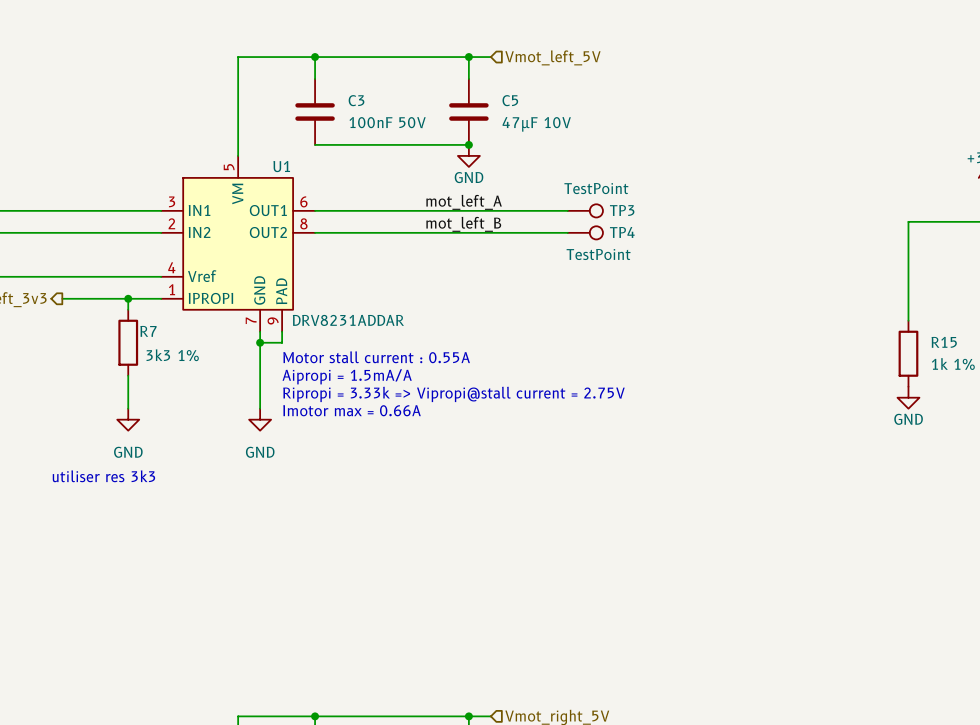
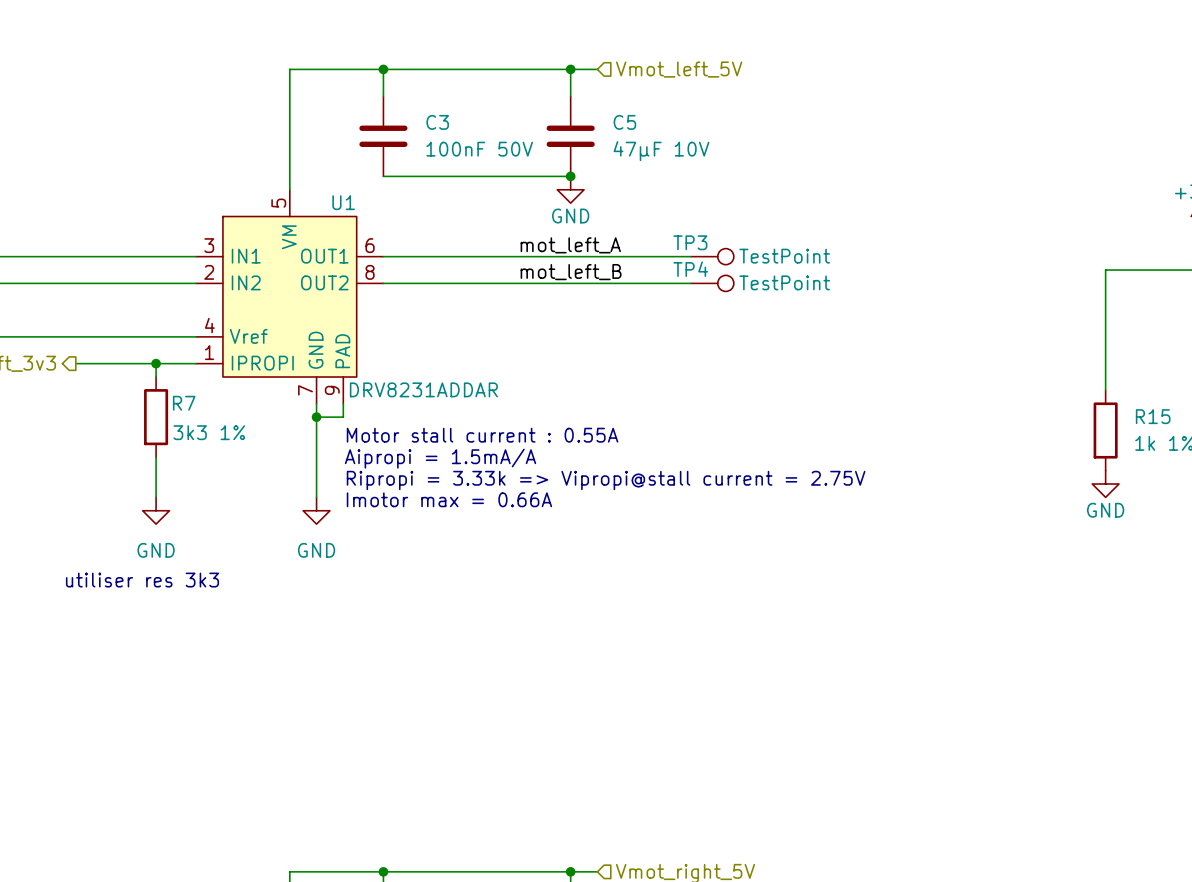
TP3 value position: TestPoint (596, 188) -> TestPoint (784, 256)
TP3 name position: TP3 (622, 210) -> TP3 (690, 242)
TP4 name position: TP4 (622, 232) -> TP4 (690, 269)
TP4 value position: TestPoint (598, 254) -> TestPoint (784, 282)

